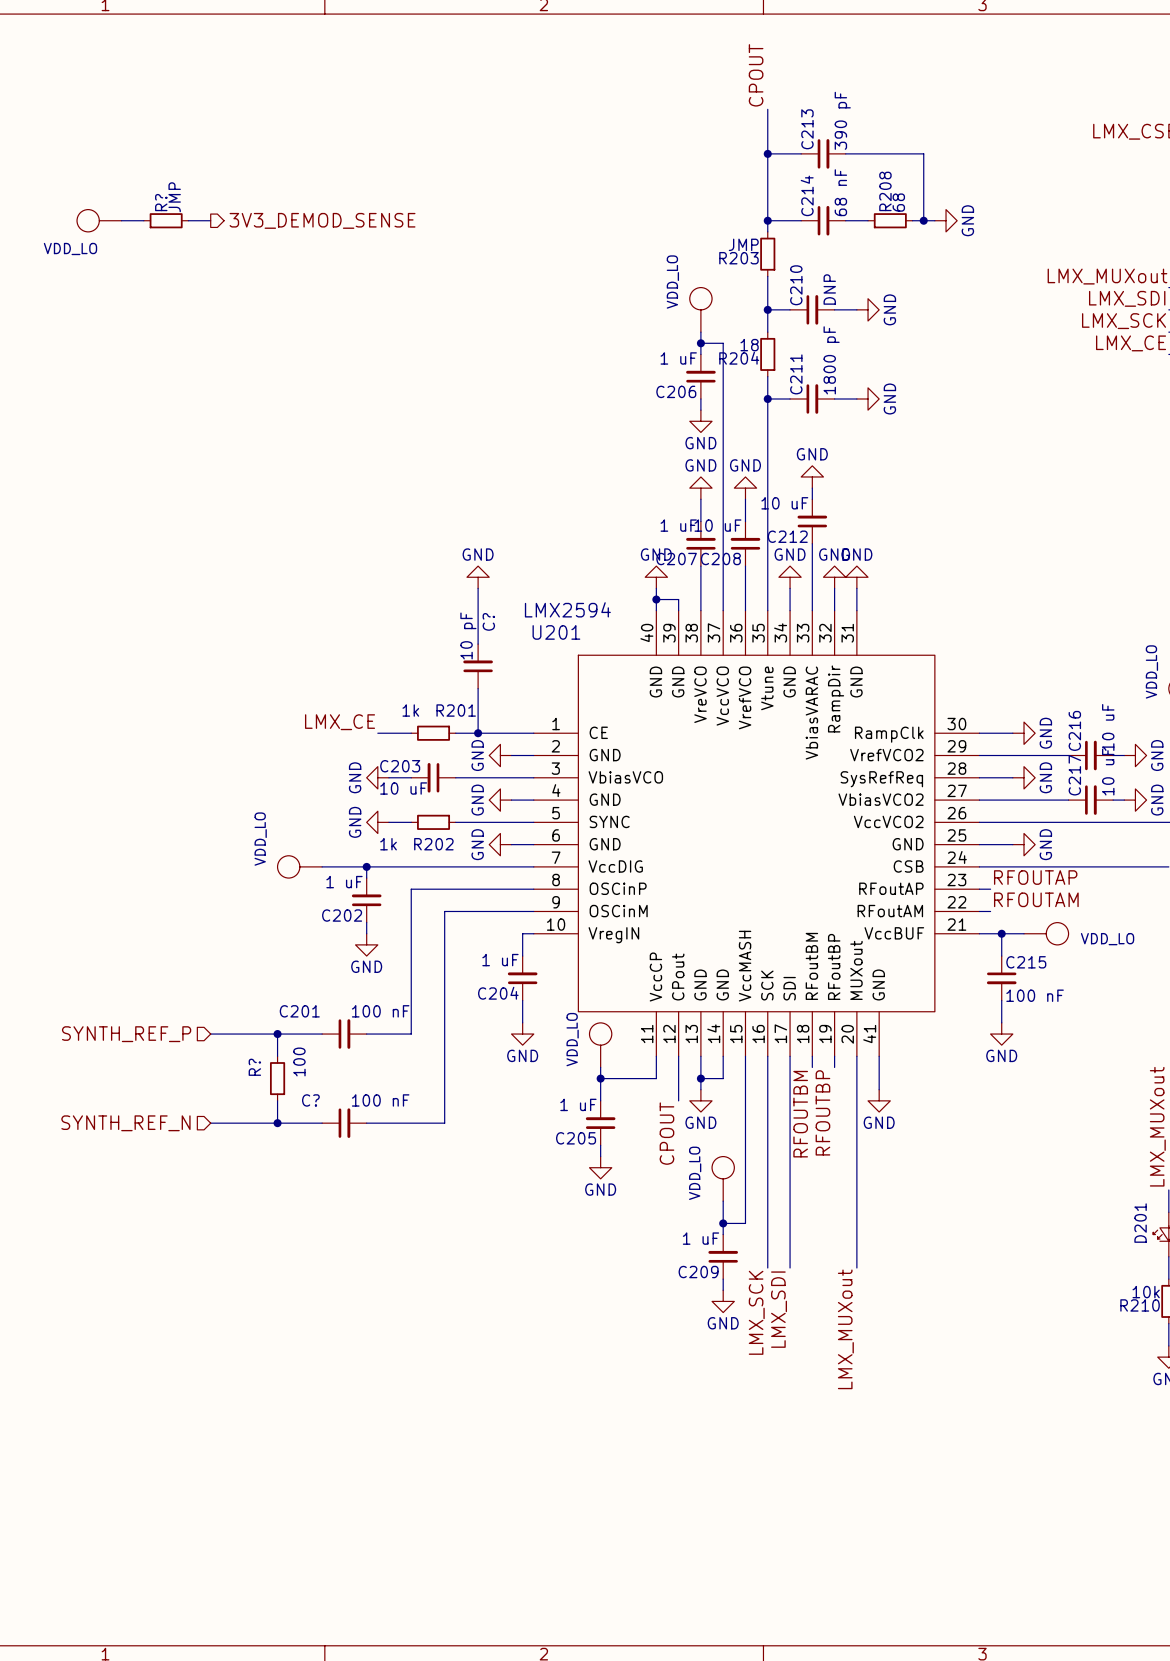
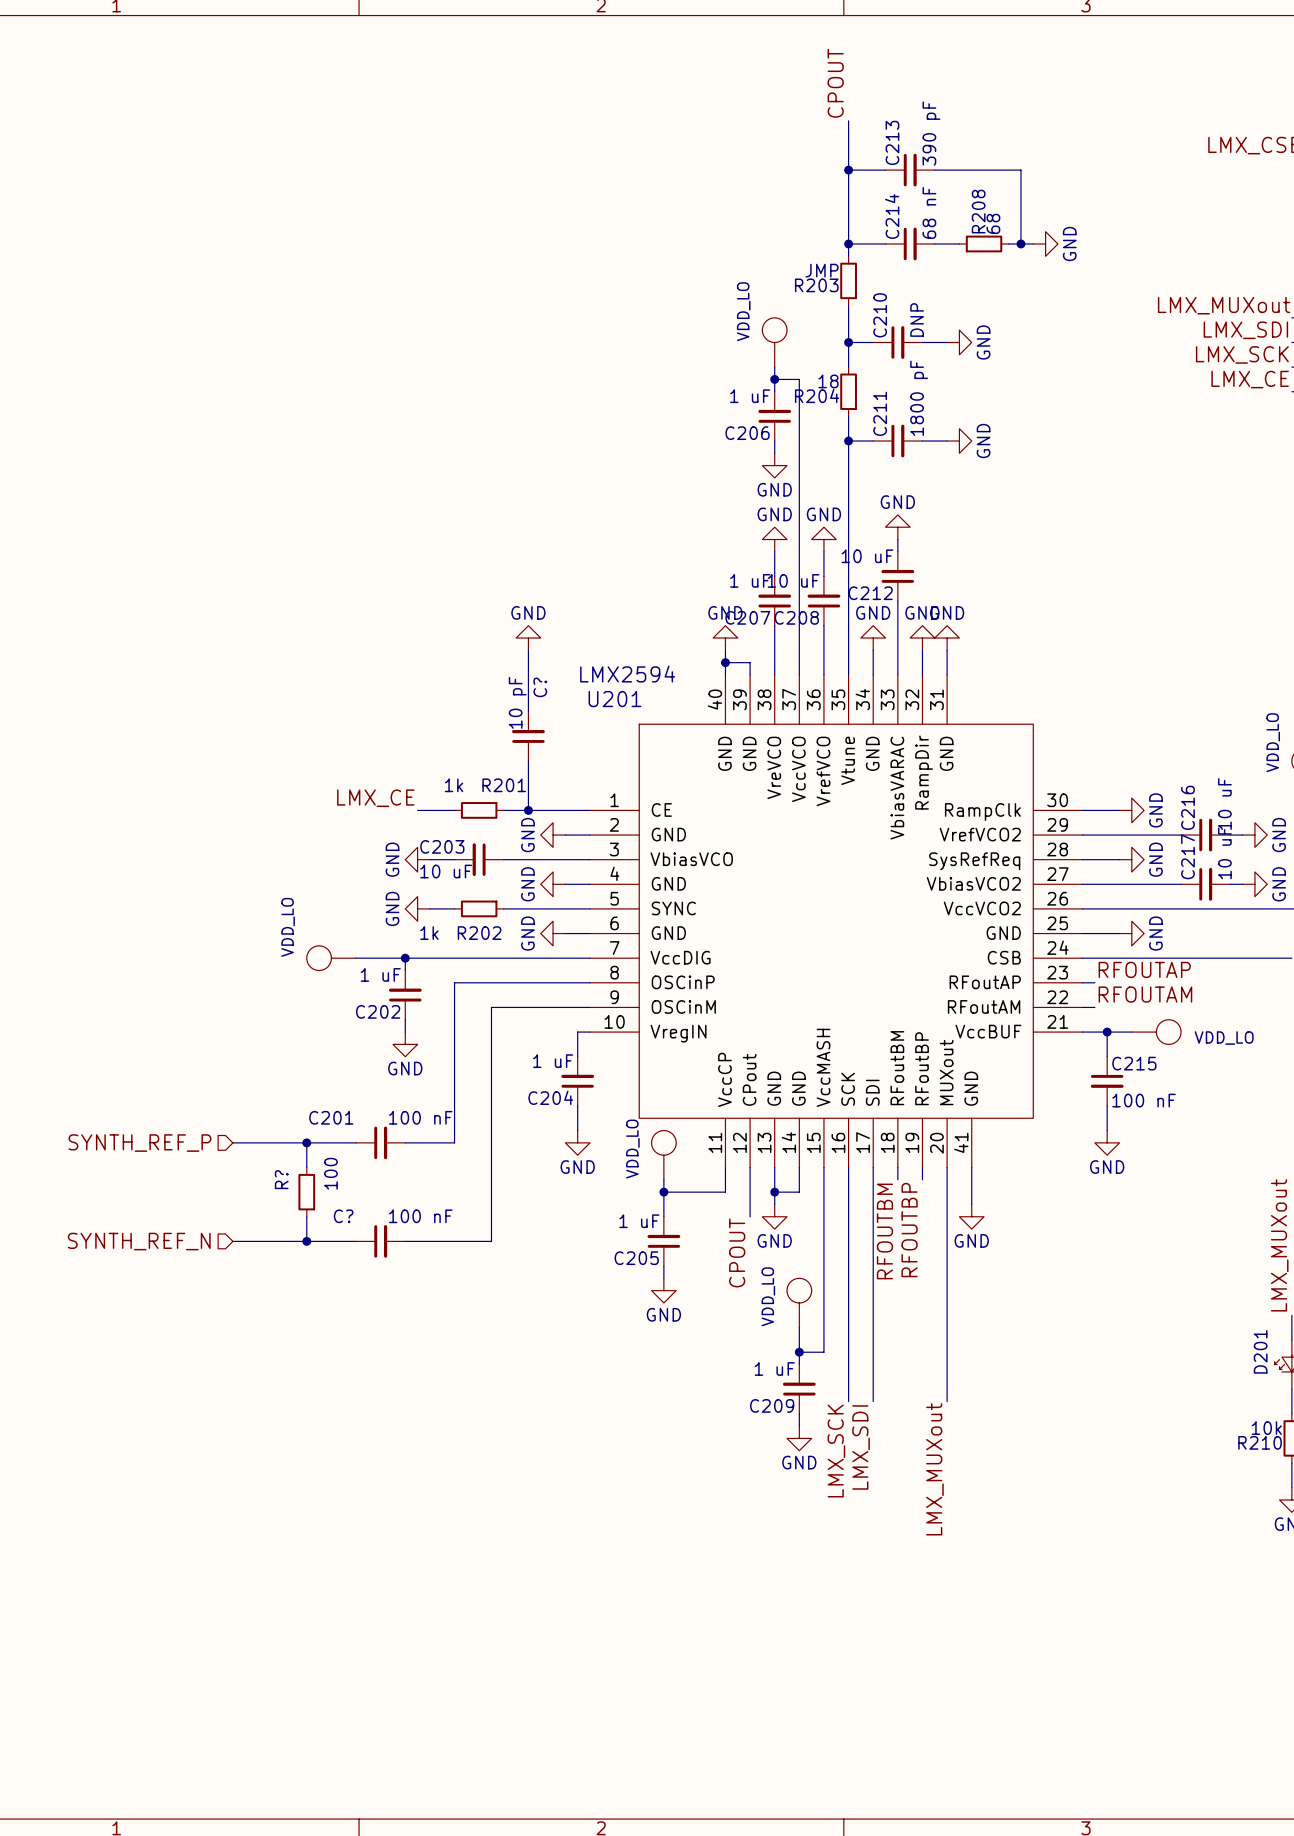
power symbol: VDD_LO (99, 220) -> none
wire: (121, 220) (143, 220) -> none
R?: JMP (166, 220) -> none
wire: (188, 220) (210, 220) -> none
hierarchical label: 3V3_DEMOD_SENSE (322, 220) -> none

